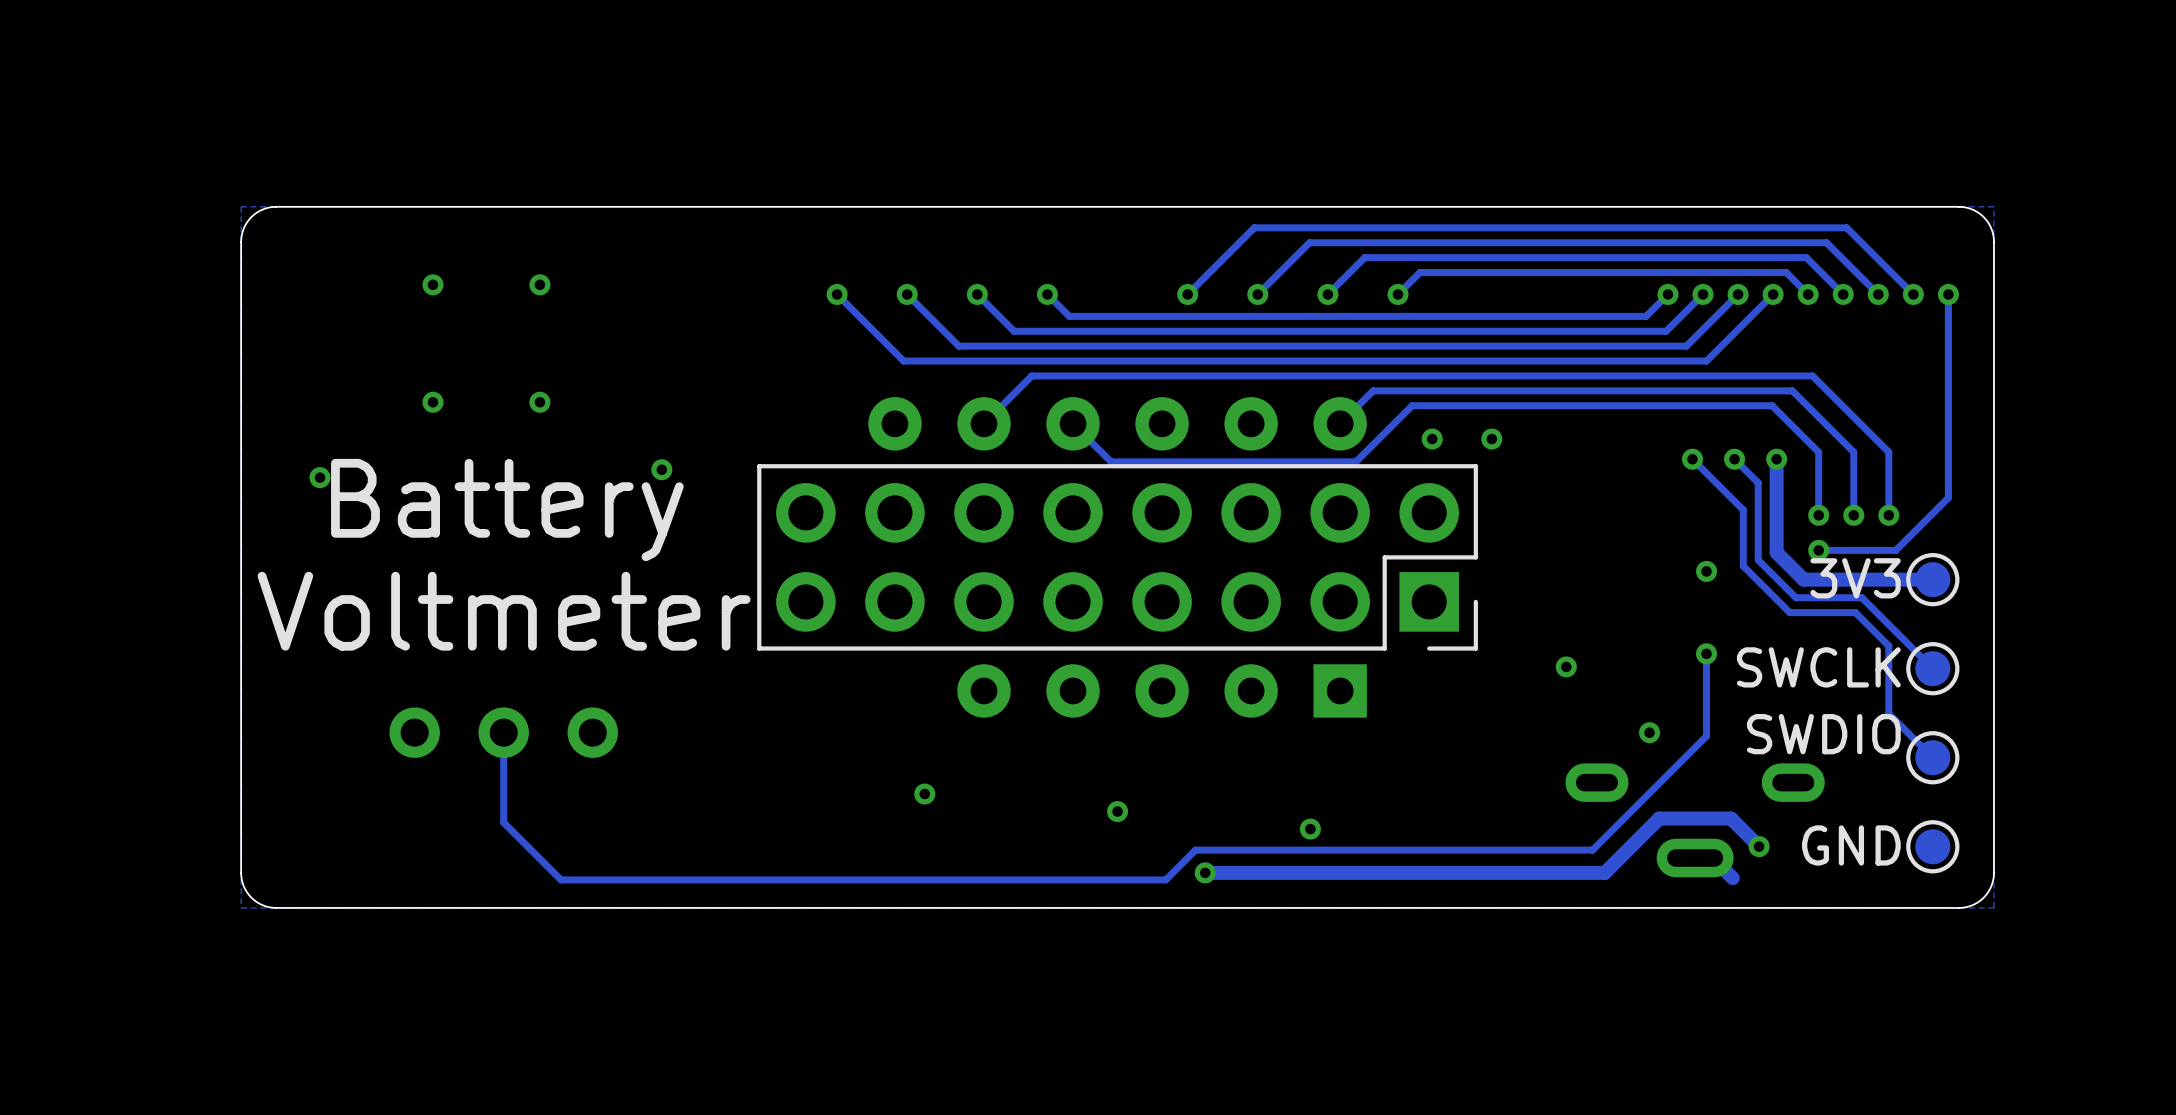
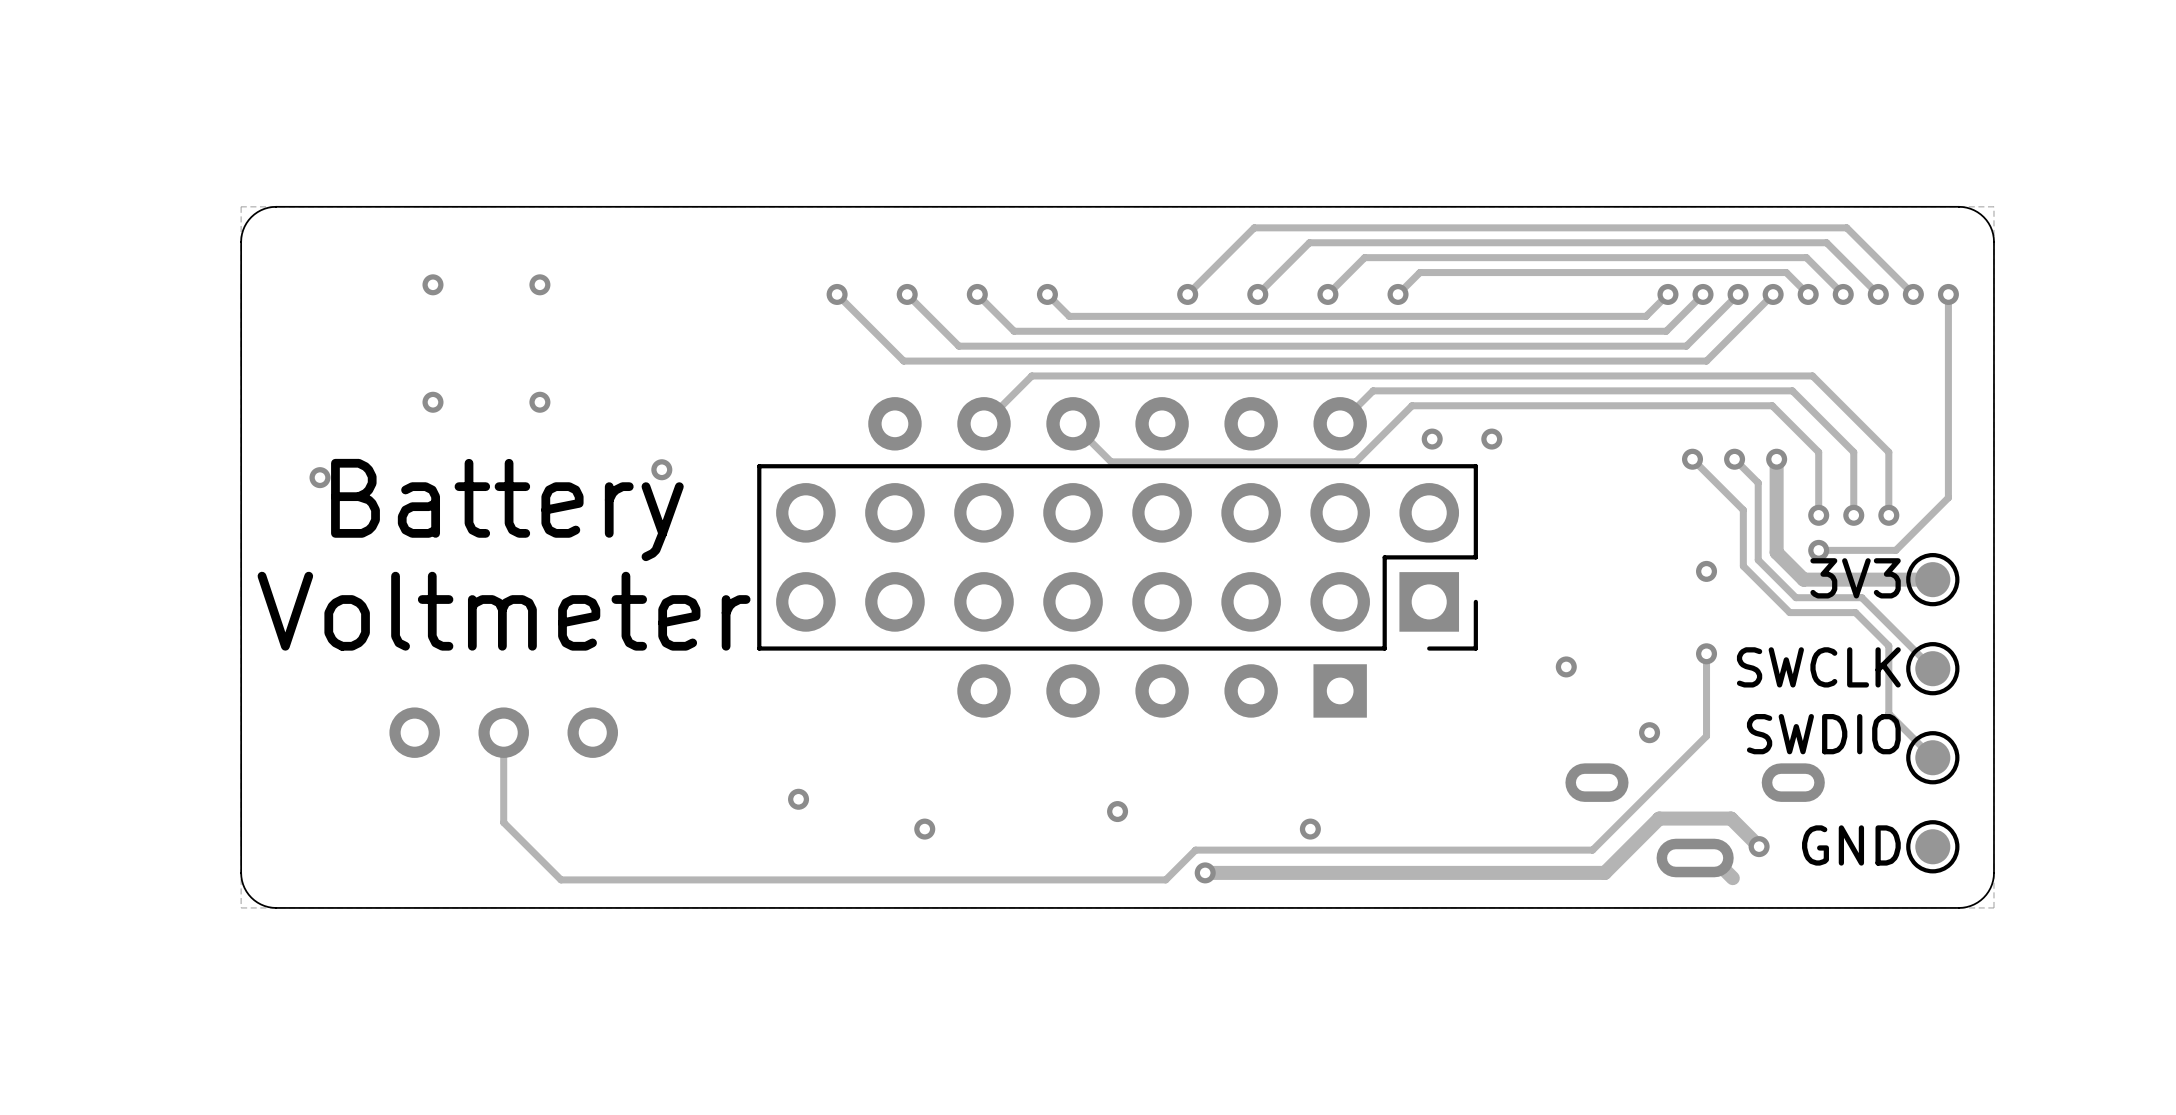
via position: (924, 794) -> (924, 829)
via: none -> (798, 799)

